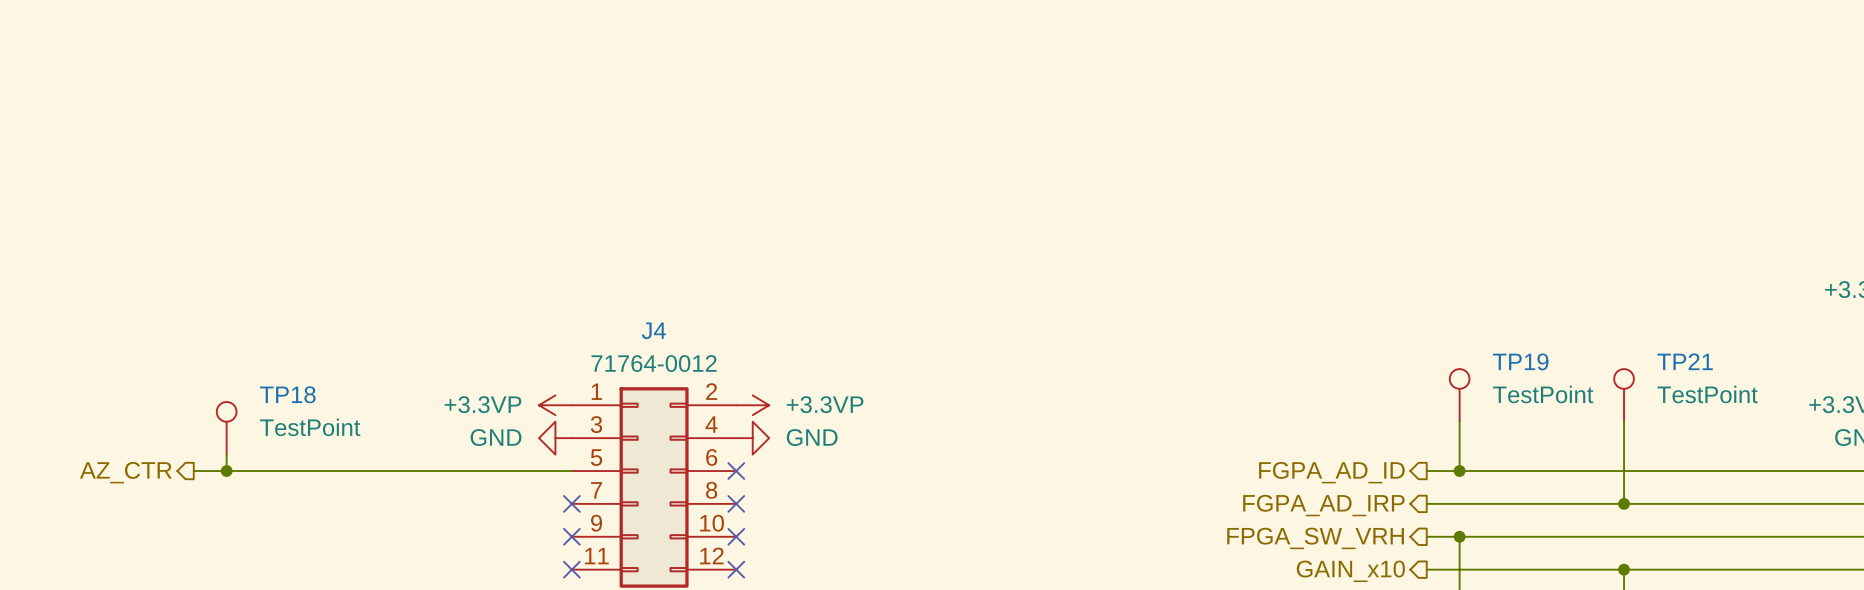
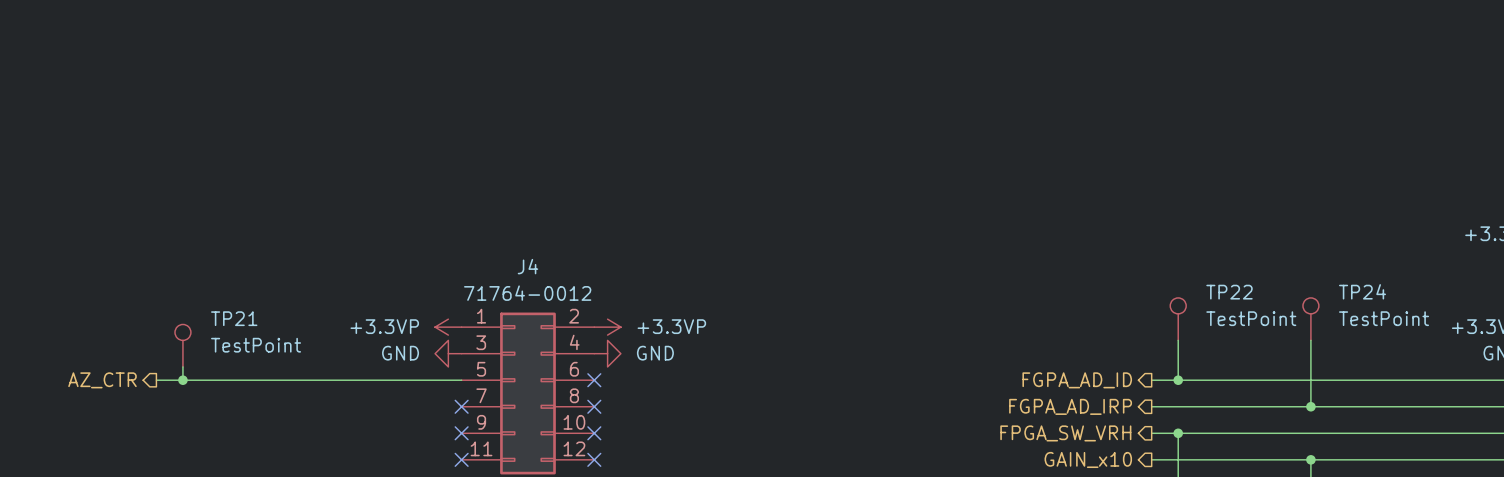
TP19 name: TP19 (1520, 361) -> TP22 (1229, 292)
TP21 name: TP21 (1685, 361) -> TP24 (1362, 291)
TP18 name: TP18 (287, 394) -> TP21 (234, 318)

